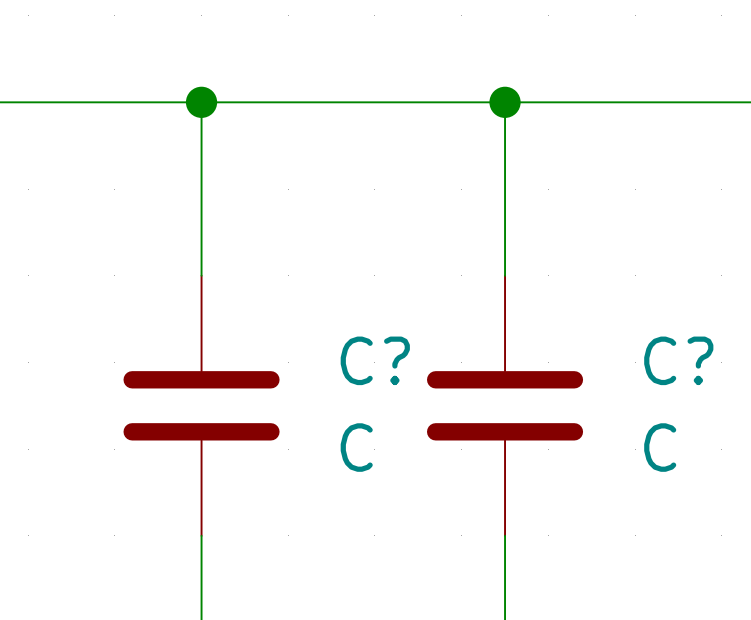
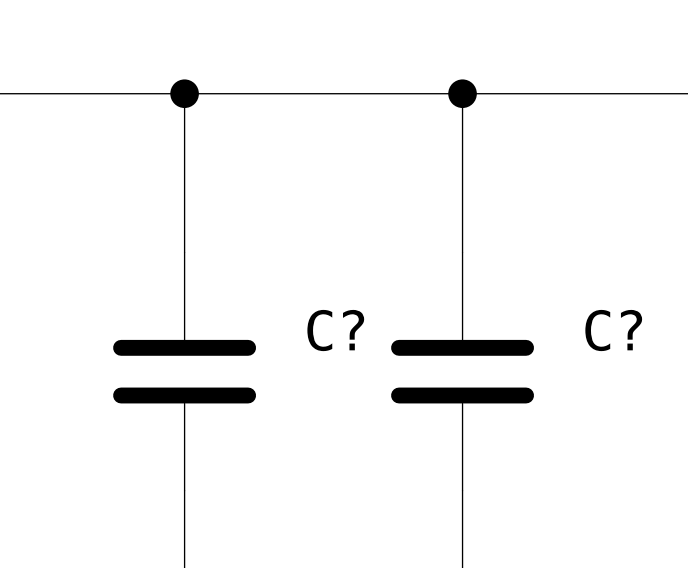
C? value: C (356, 447) -> none
C? value: C (660, 447) -> none

